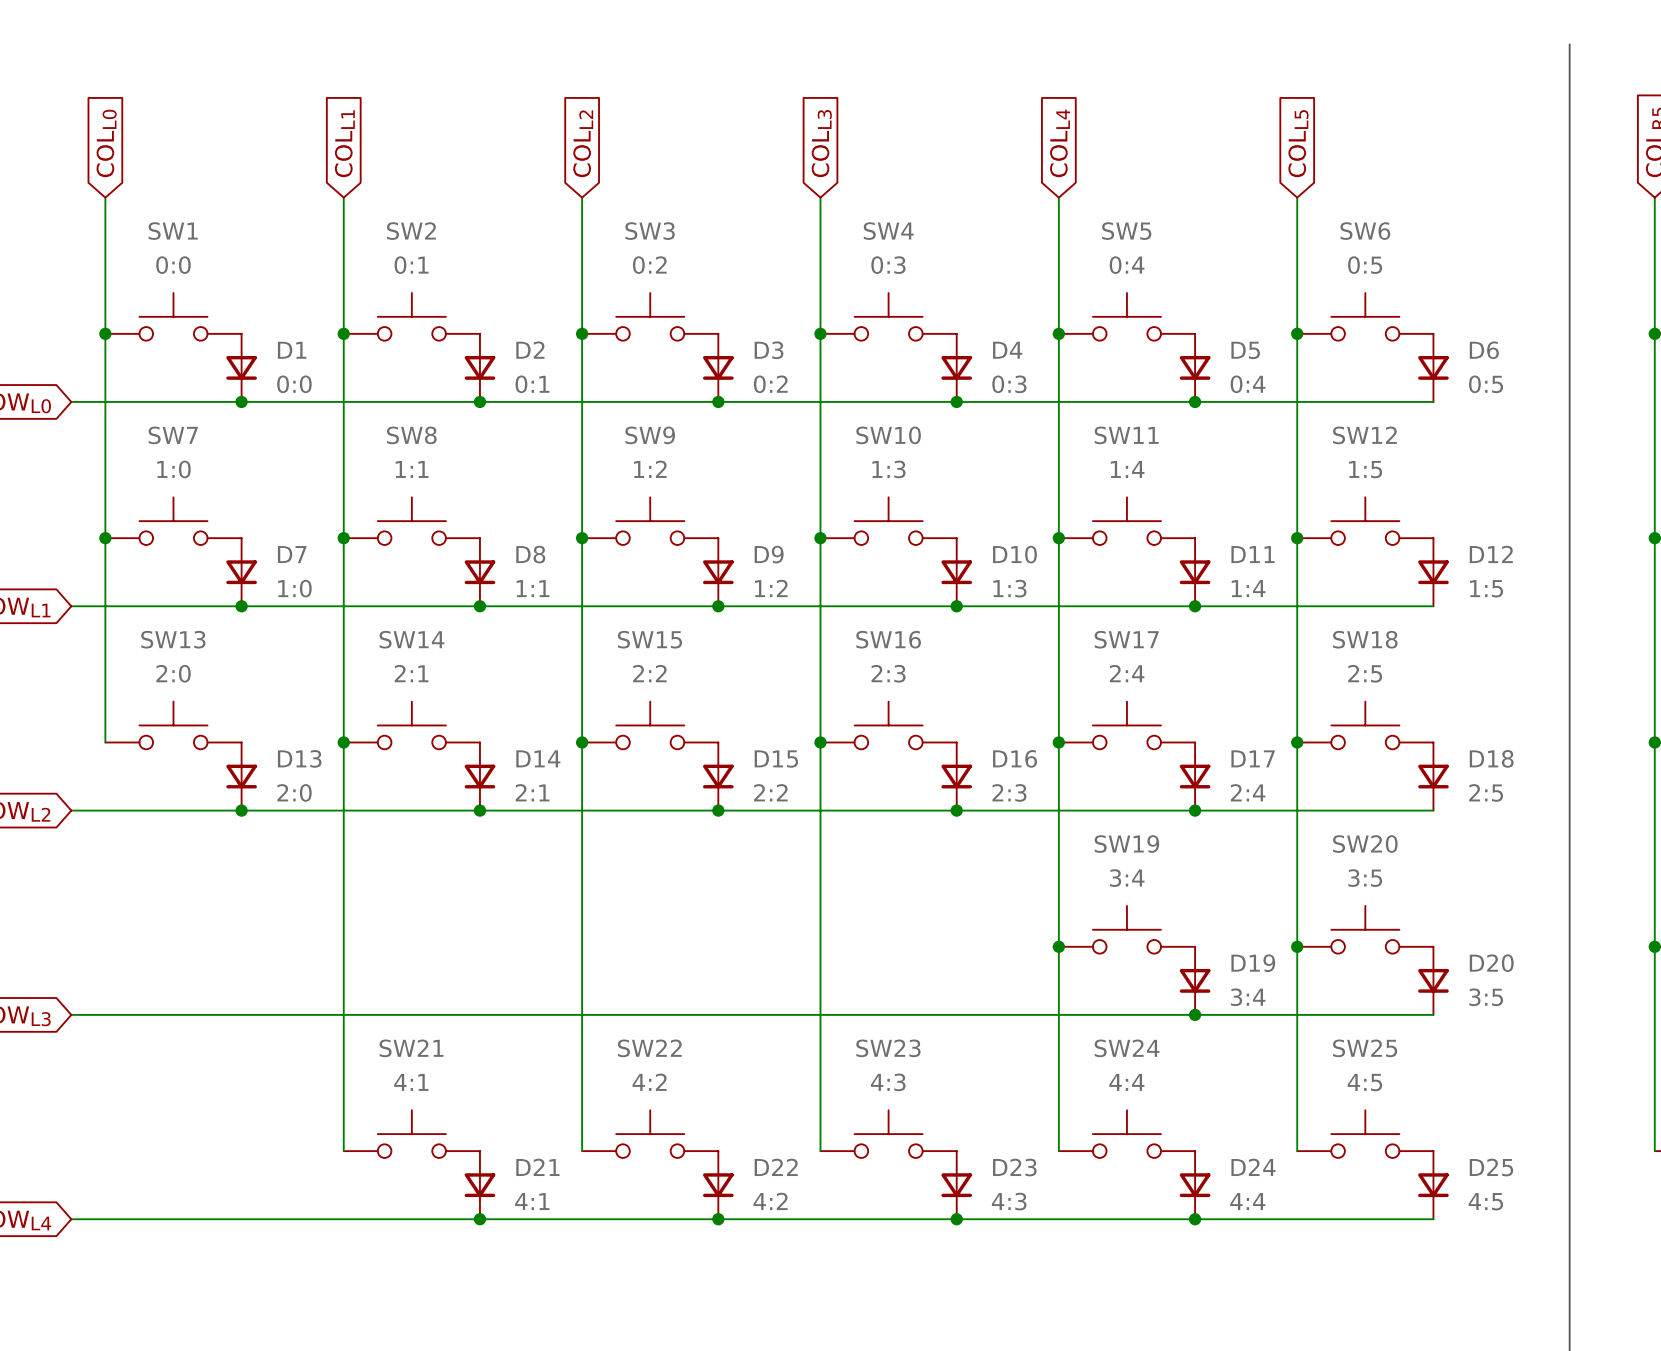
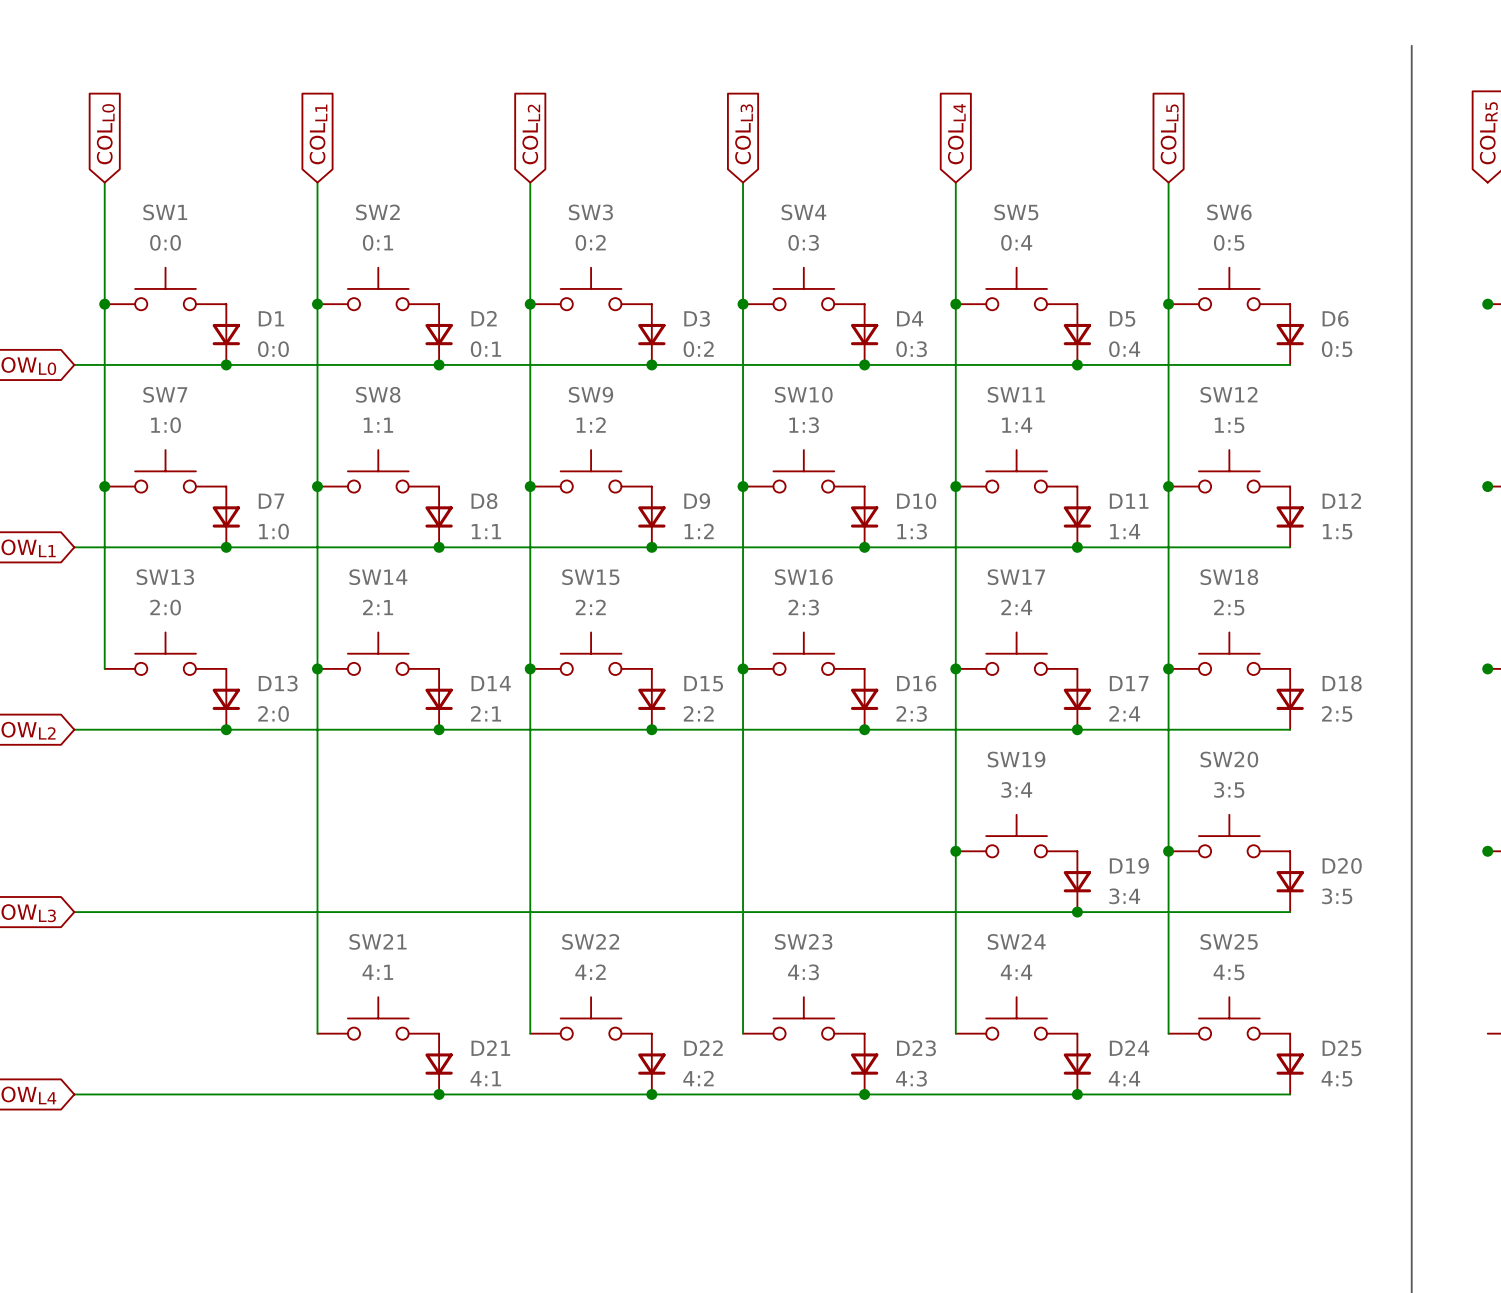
wire: (1654, 197) (1654, 1151) -> none

